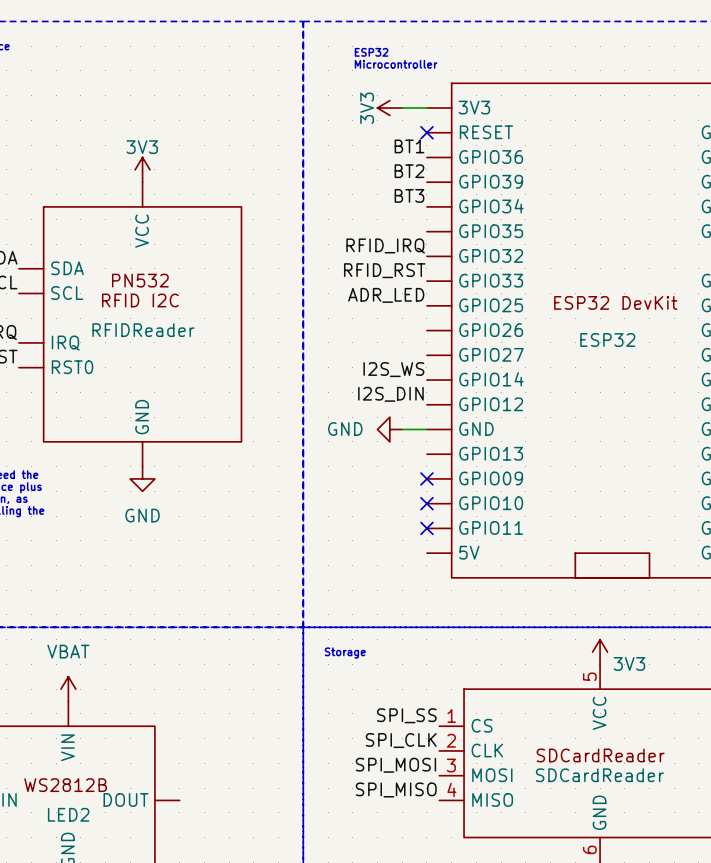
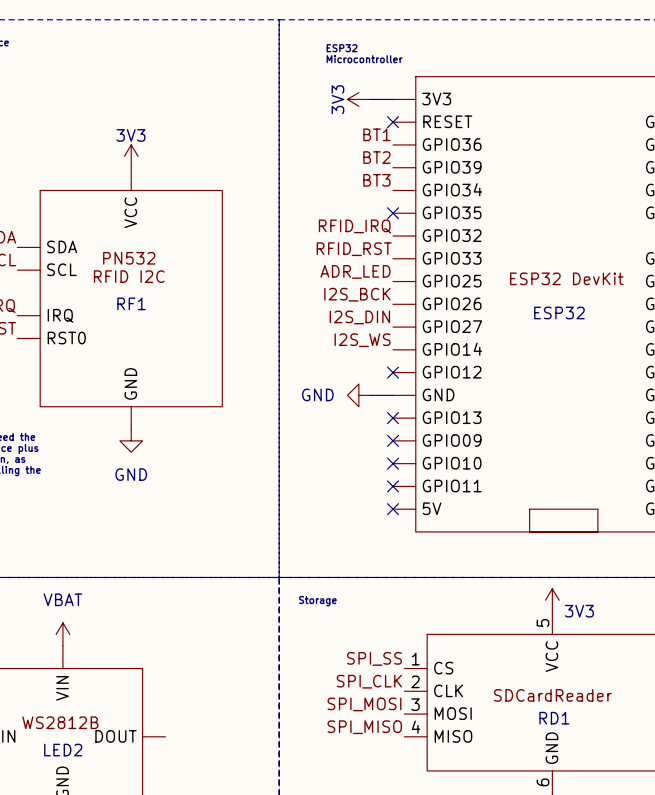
no-connect mark: none -> (393, 213)
label: none -> I2S_BCK (357, 294)
RFIDReader name: RFIDReader (143, 330) -> RF1 (131, 303)
label position: I2S_DIN (390, 394) -> I2S_DIN (359, 317)
no-connect mark: none -> (393, 372)
no-connect mark: none -> (393, 418)
no-connect mark: none -> (393, 509)
SDCardReader name: SDCardReader (599, 775) -> RD1 (554, 718)

